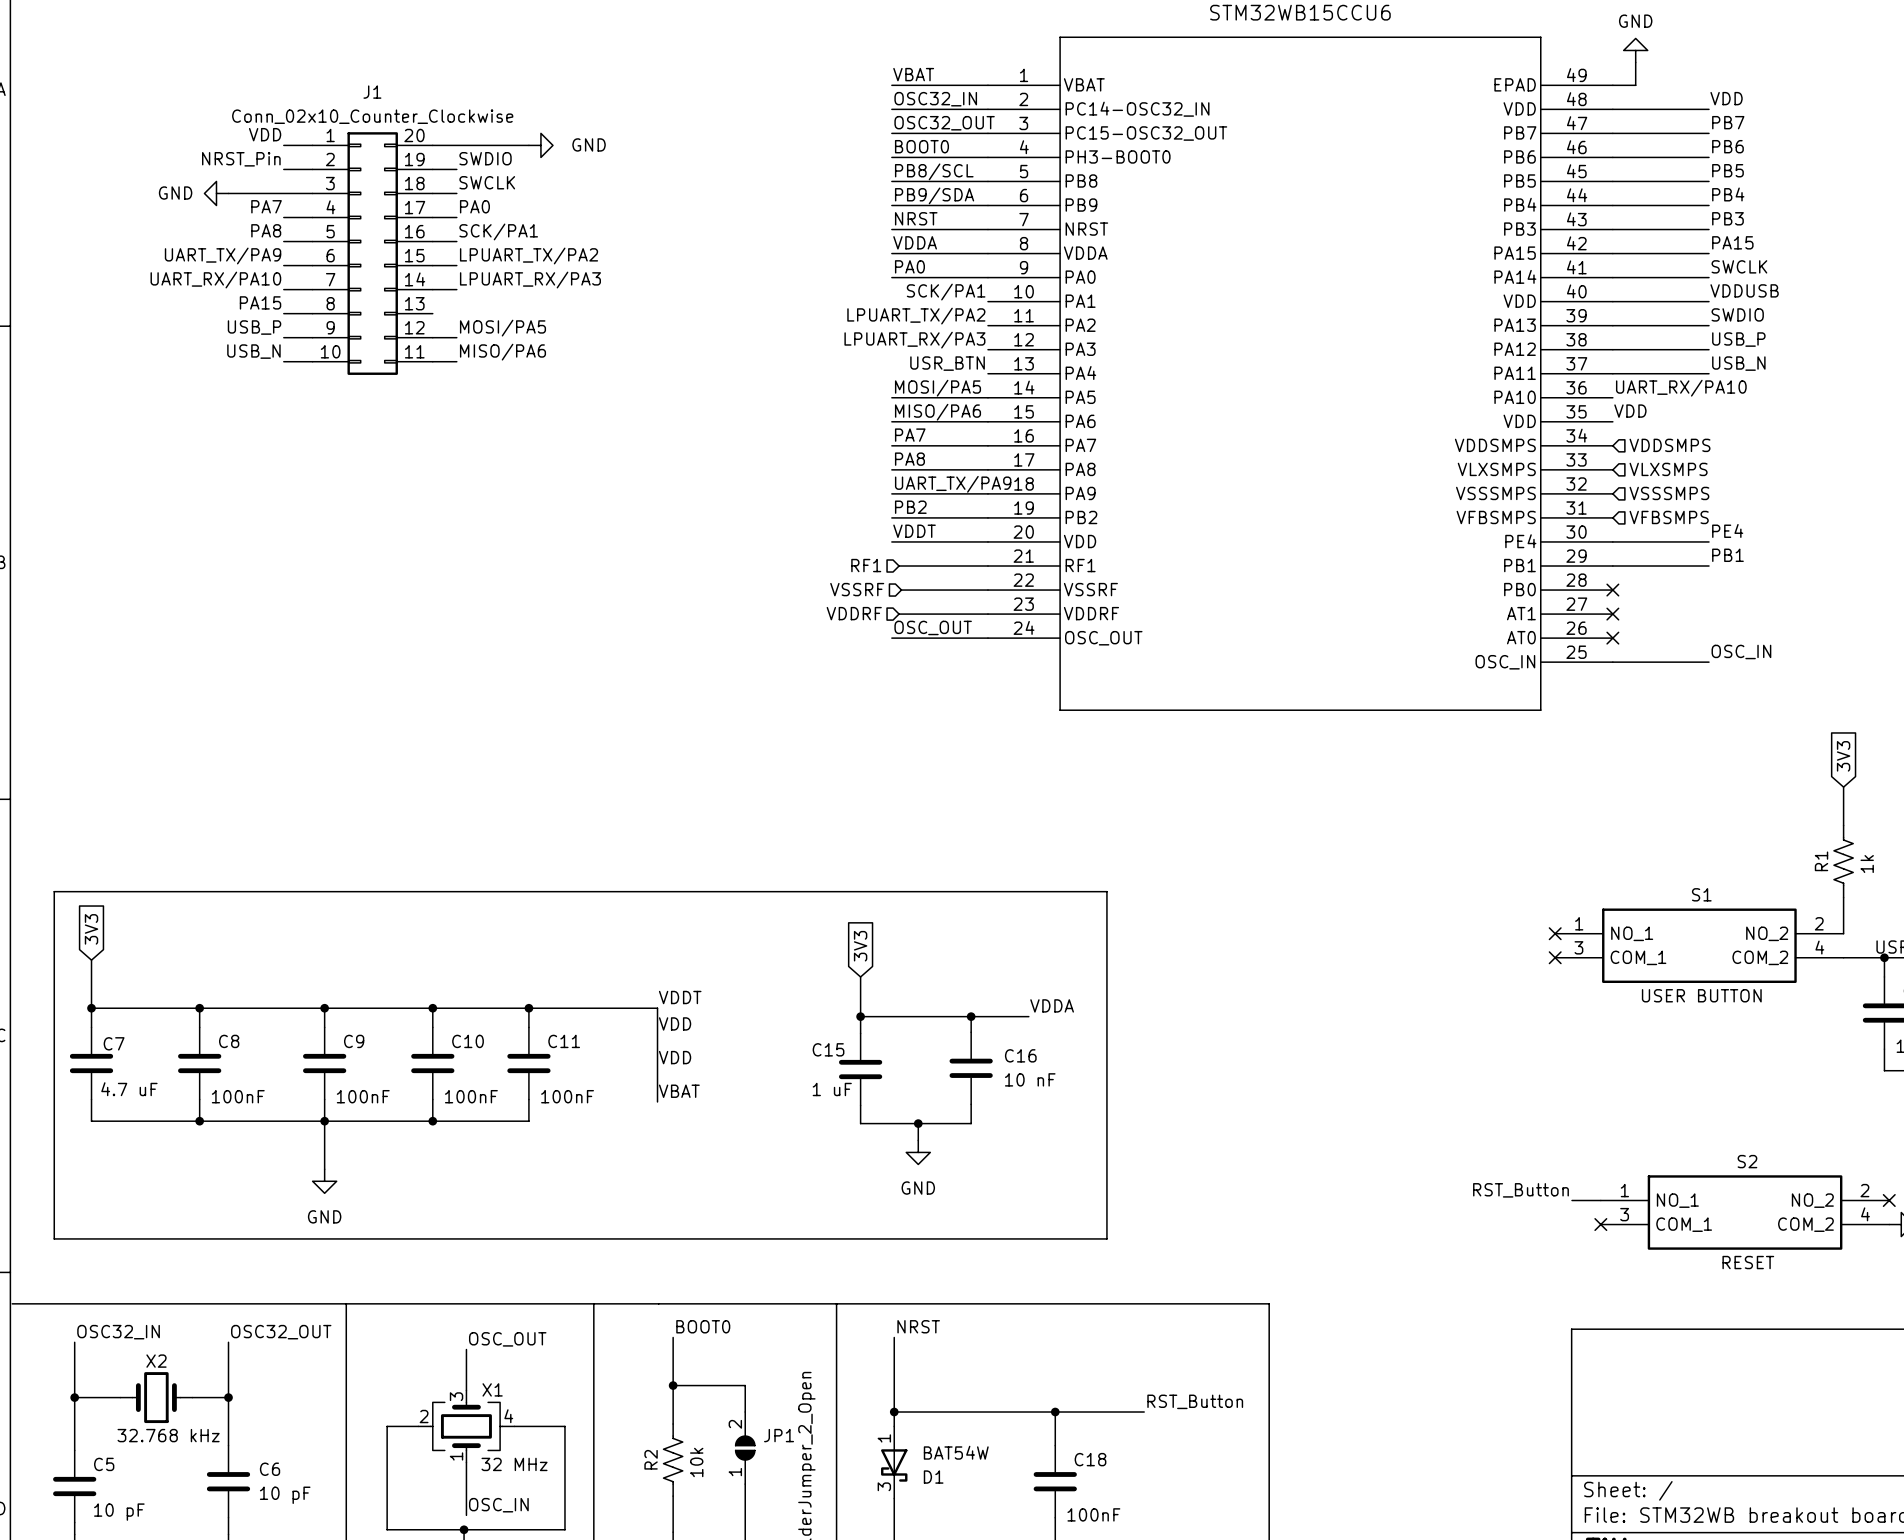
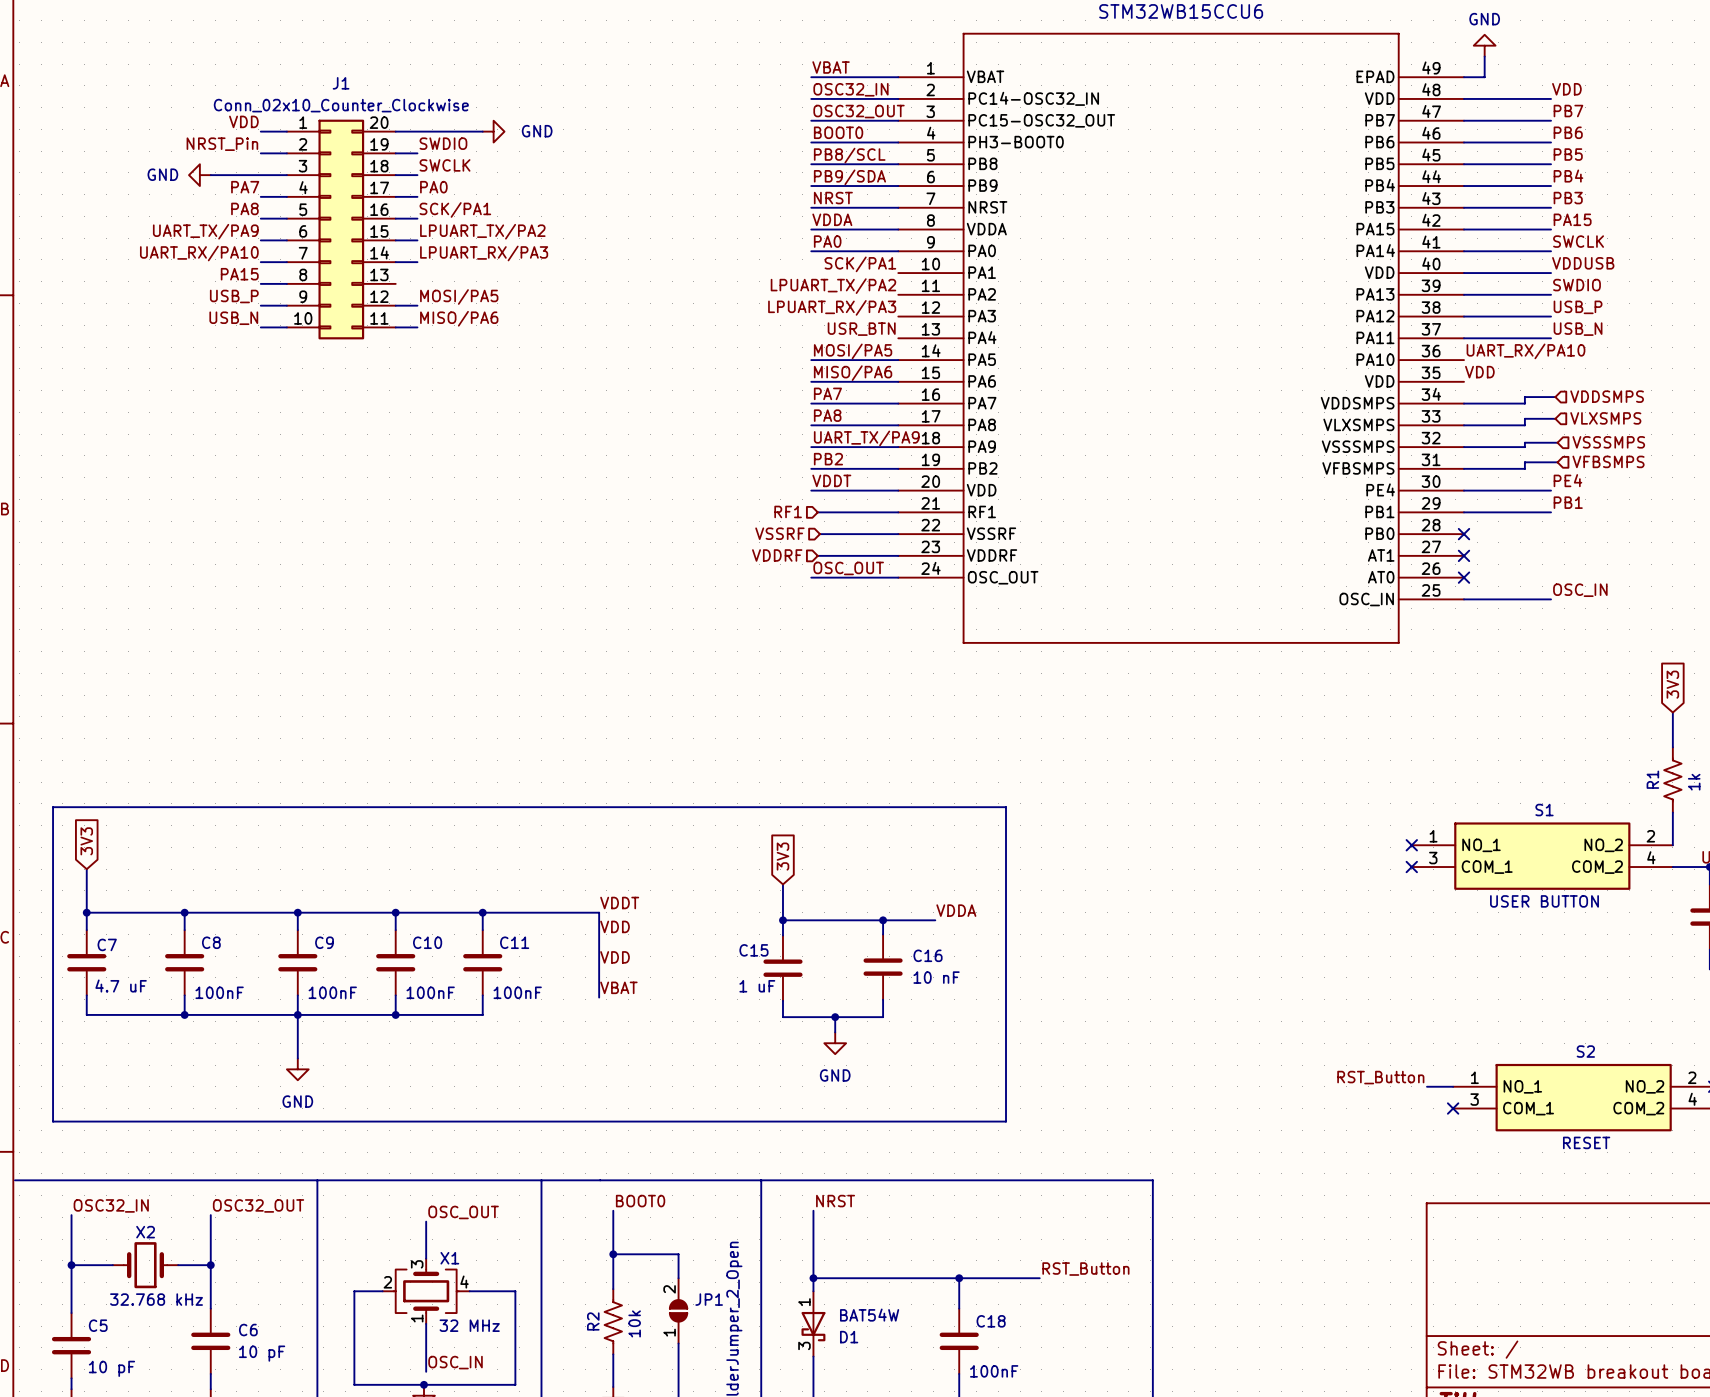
wire: none -> (1555, 397) (1524, 397) (1524, 403) (1463, 403)
hierarchical label position: VDDSMPS (1669, 445) -> VDDSMPS (1607, 396)
wire: none -> (1555, 418) (1524, 418) (1524, 425) (1463, 425)
hierarchical label position: VLXSMPS (1668, 469) -> VLXSMPS (1605, 418)
wire: none -> (1557, 442) (1524, 442) (1524, 447) (1463, 447)
hierarchical label position: VSSSMPS (1669, 493) -> VSSSMPS (1608, 442)
wire: none -> (1557, 462) (1524, 462) (1524, 468) (1463, 468)
hierarchical label position: VFBSMPS (1669, 517) -> VFBSMPS (1608, 461)

